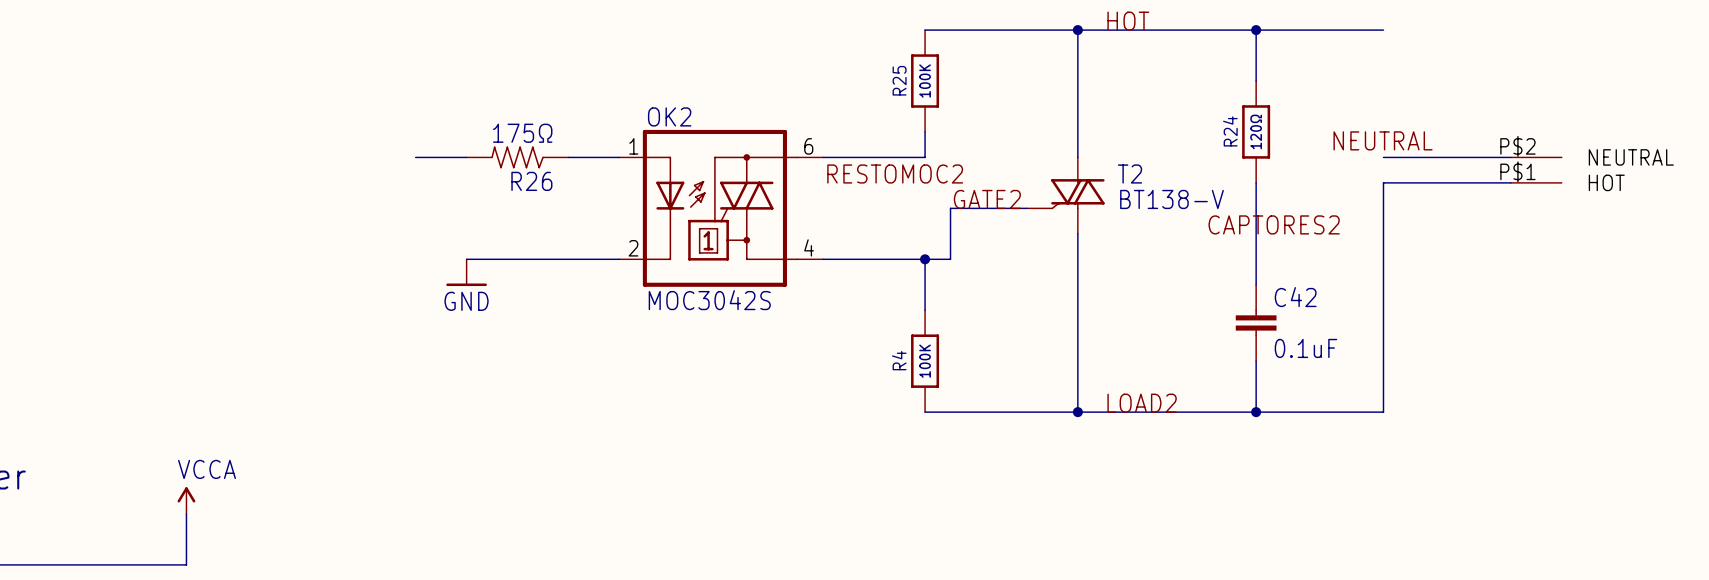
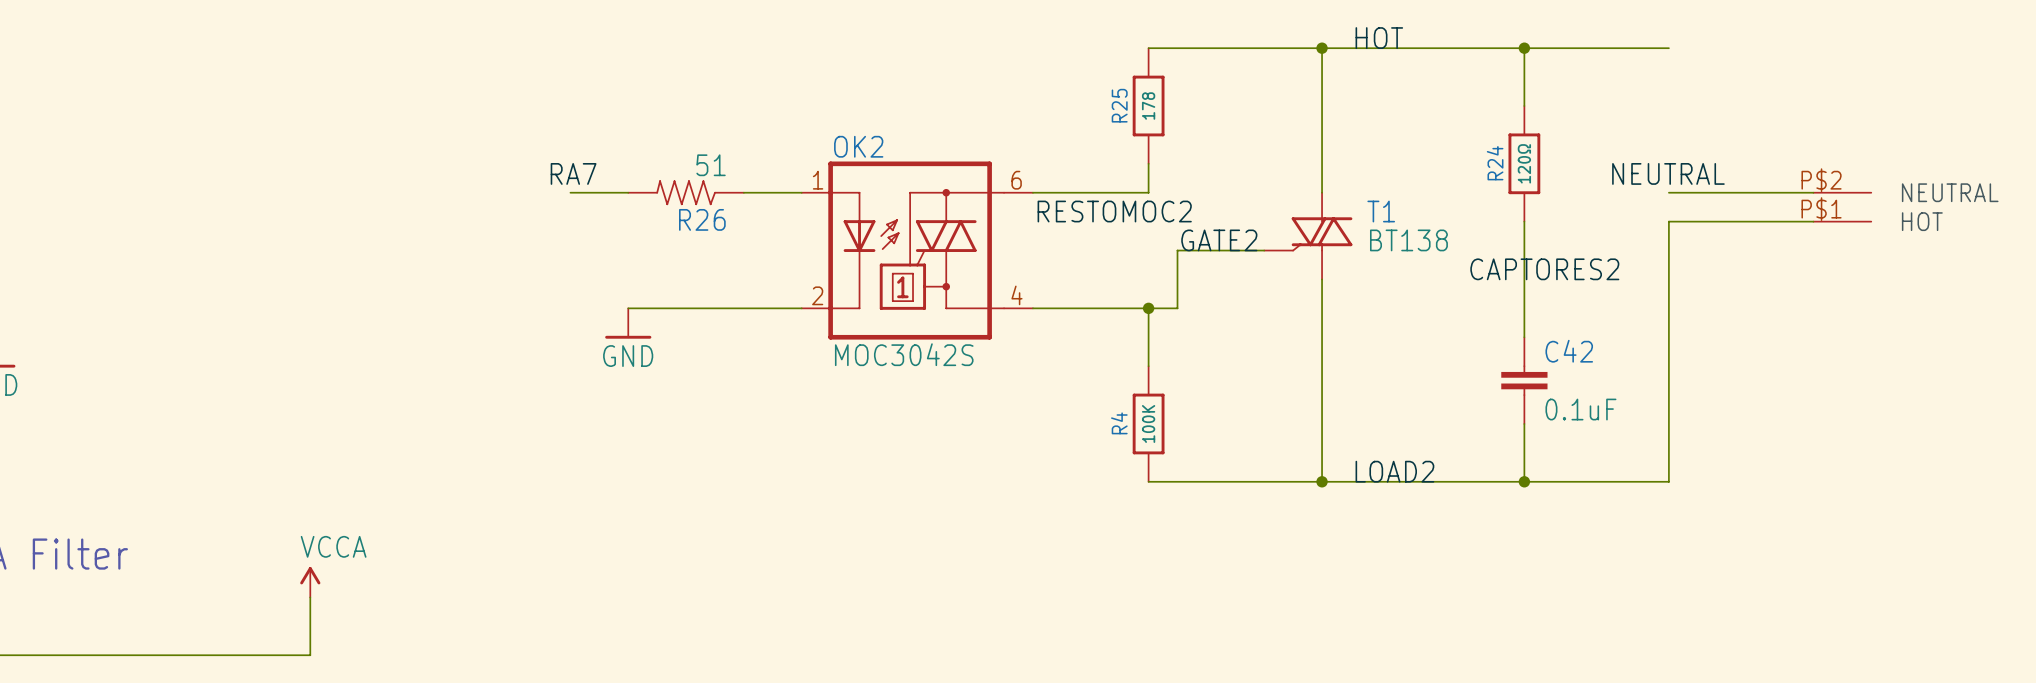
R25 value: 100K (925, 81) -> 178 (1148, 106)
R26 value: 175Ω (522, 133) -> 51 (711, 165)
label: none -> RA7 (573, 173)
T2 name: T2 (1129, 173) -> T1 (1381, 211)
T2 value: BT138-V (1172, 199) -> BT138 (1408, 240)

